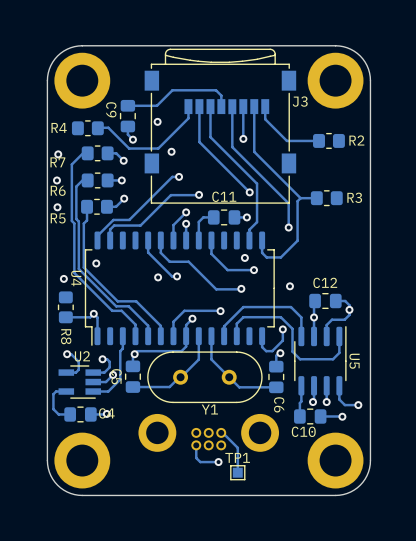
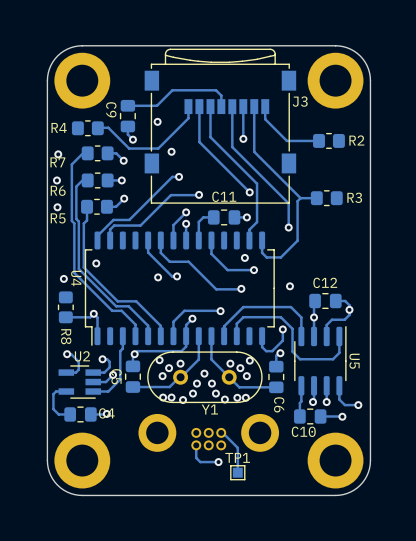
via: none -> (159, 360)
via: none -> (249, 360)
via: none -> (180, 363)
via: none -> (230, 363)
via: none -> (169, 368)
via: none -> (240, 368)
via: none -> (204, 373)
via: none -> (162, 376)
via: none -> (246, 376)
via: none -> (196, 383)
via: none -> (211, 383)
via: none -> (193, 393)
via: none -> (215, 393)
via: none -> (163, 397)
via: none -> (171, 397)
via: none -> (237, 397)
via: none -> (245, 397)
via: none -> (224, 399)
via: none -> (183, 400)

